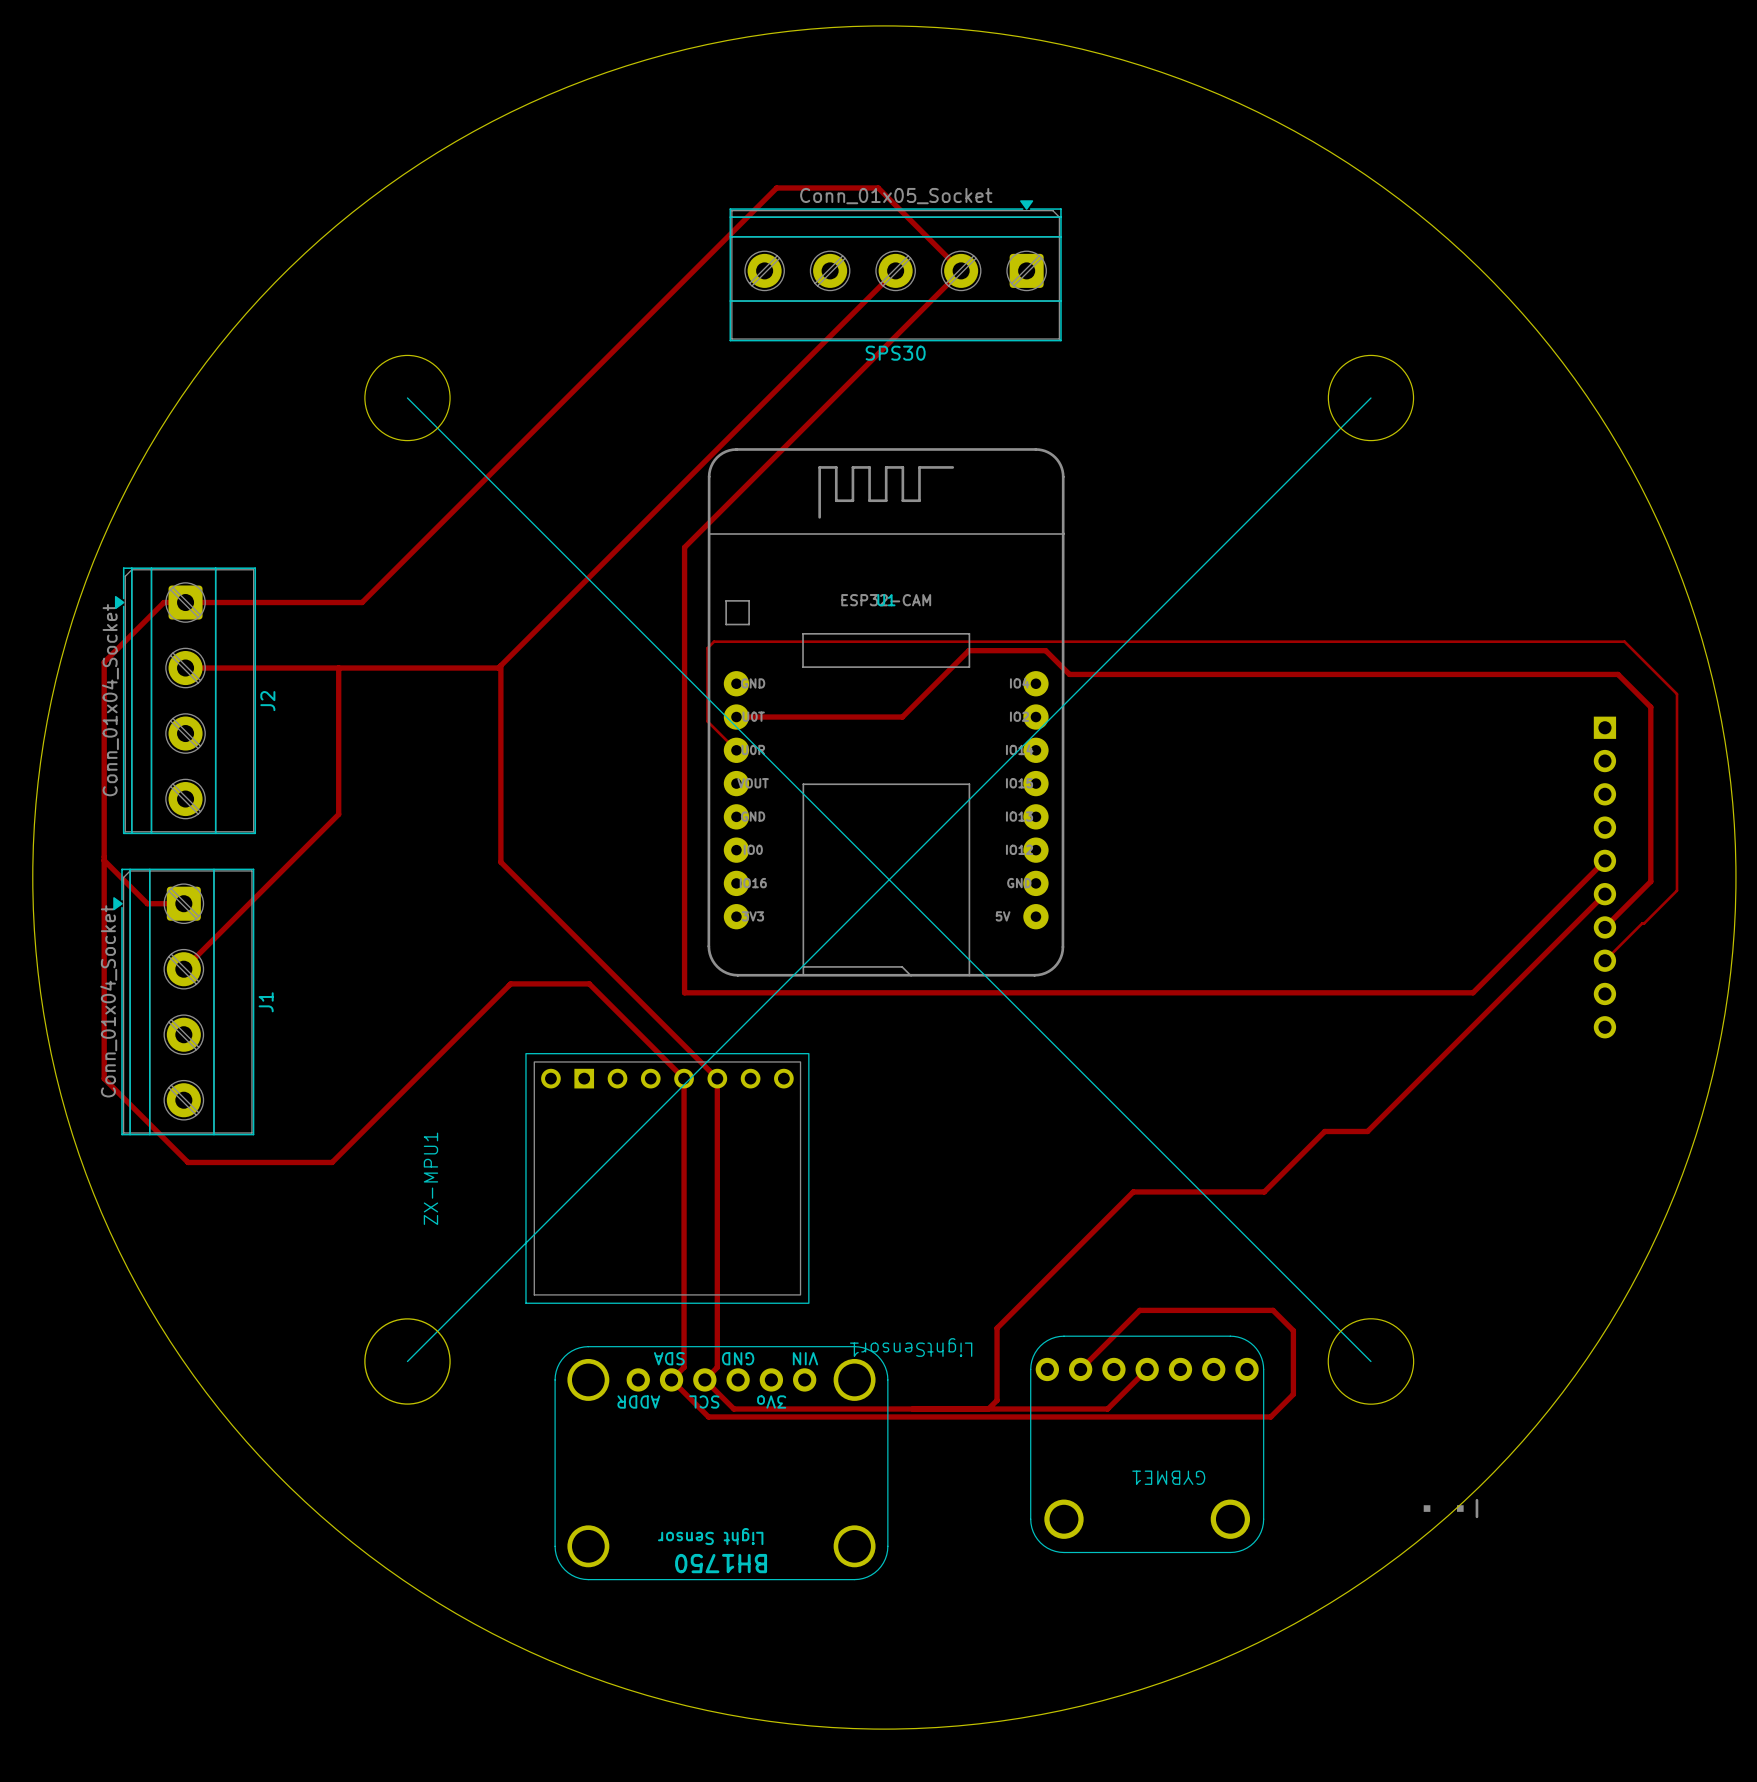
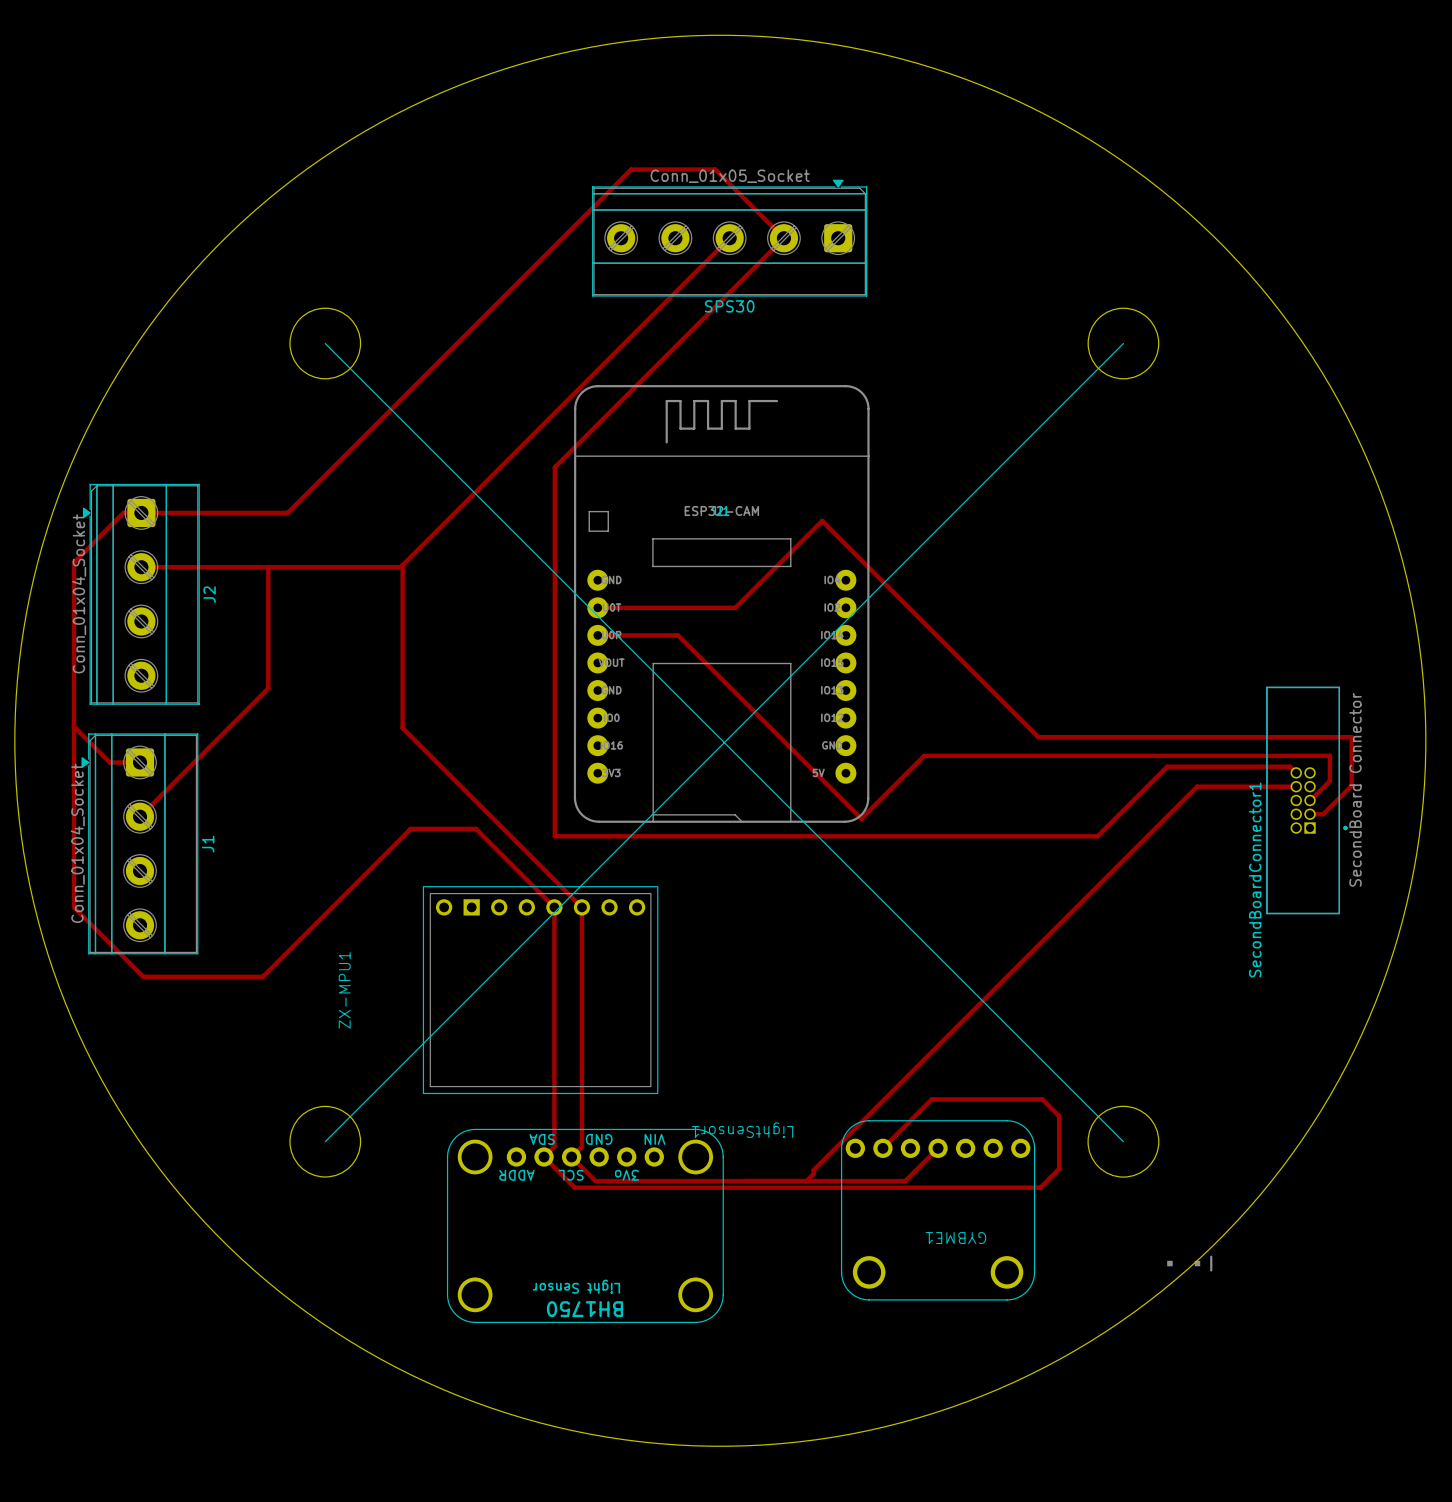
track: (968, 650) (1045, 650) -> (790, 552) (822, 520) (854, 552)
track: (1069, 674) (1618, 674) (1650, 707) (1650, 881) (1604, 927) -> (873, 572) (1038, 737) (1351, 737) (1351, 785) (1323, 814) (1306, 814)
track: (736, 750) (707, 721) (707, 648) (714, 641) (1624, 641) (1677, 694) (1677, 890) (1604, 960) -> (597, 635) (678, 635) (861, 818) (924, 755) (1329, 755) (1329, 781) (1310, 800)
track: (1604, 860) (1473, 992) (1339, 992) -> (1296, 772) (1290, 766) (1167, 766) (1097, 836)
part: (1604, 877) -> none
track: (1604, 894) (1367, 1131) (1324, 1131) (1264, 1191) (1133, 1191) (997, 1328) (997, 1395) -> (1296, 786) (1197, 786) (813, 1170)
SecondBoardConnector1: none -> SecondBoard Connector (1306, 800)

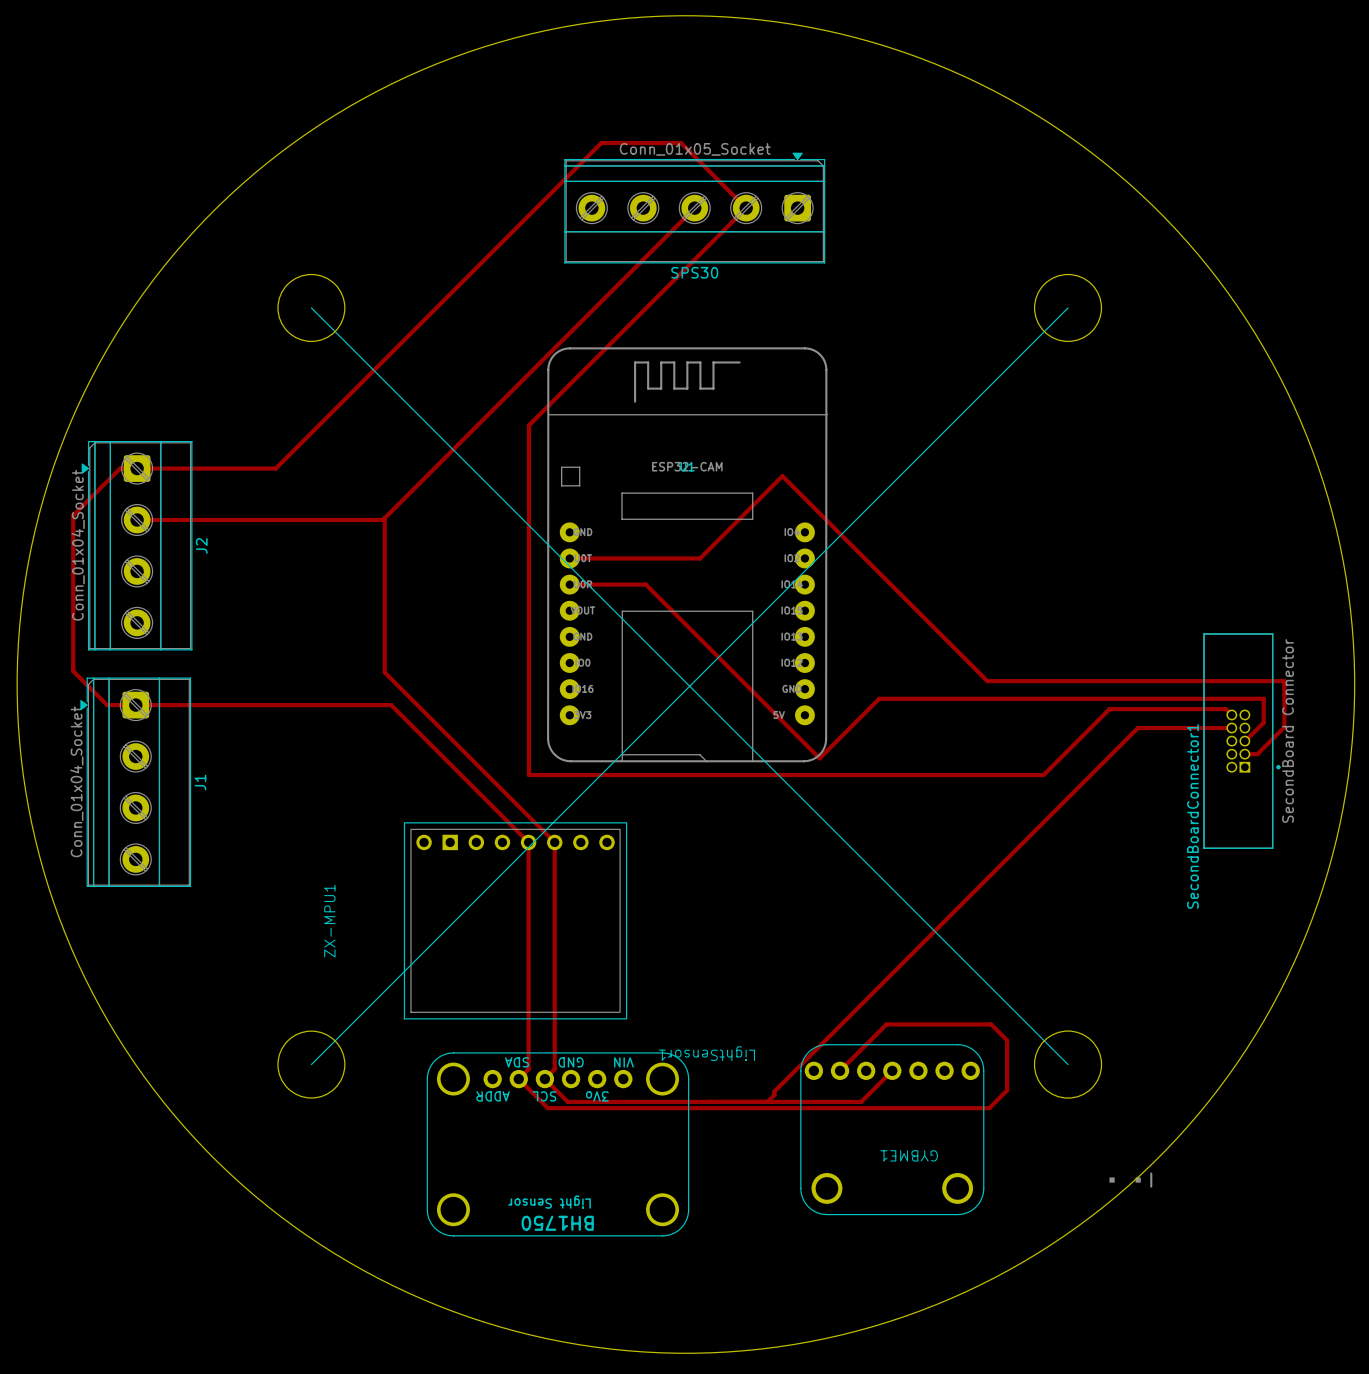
track: (268, 567) (268, 688) (139, 816) -> none
track: (74, 726) (74, 907) (143, 976) (262, 976) (410, 828) (475, 828) -> (135, 705) (391, 705) (454, 768)

